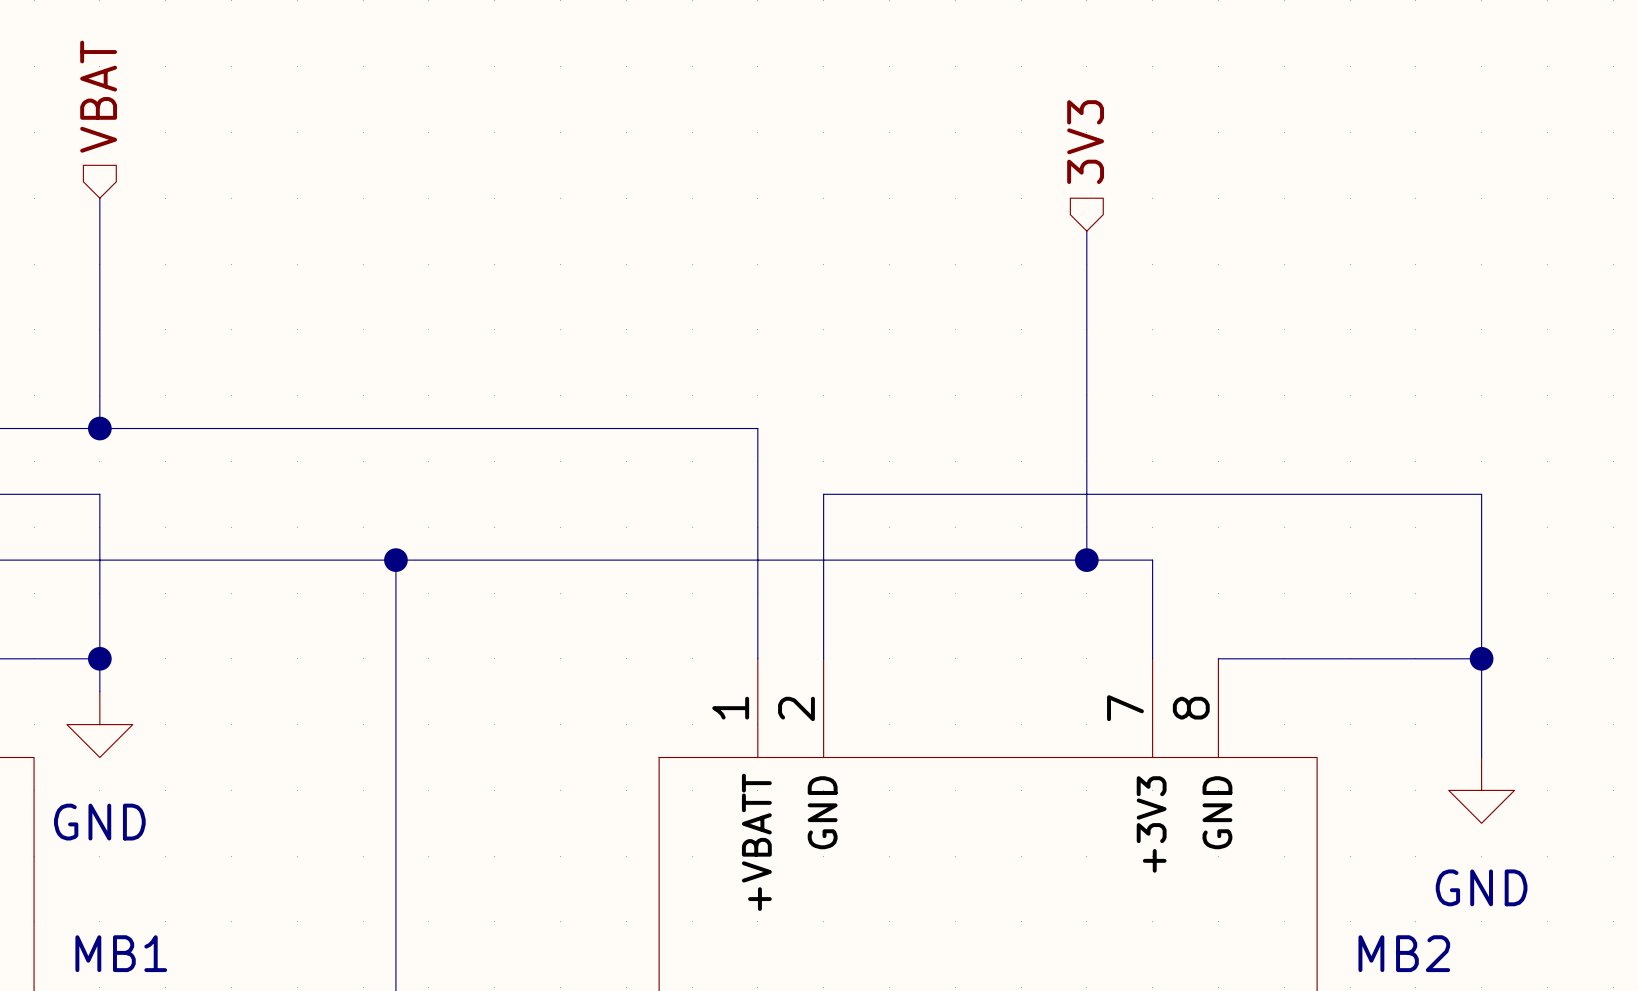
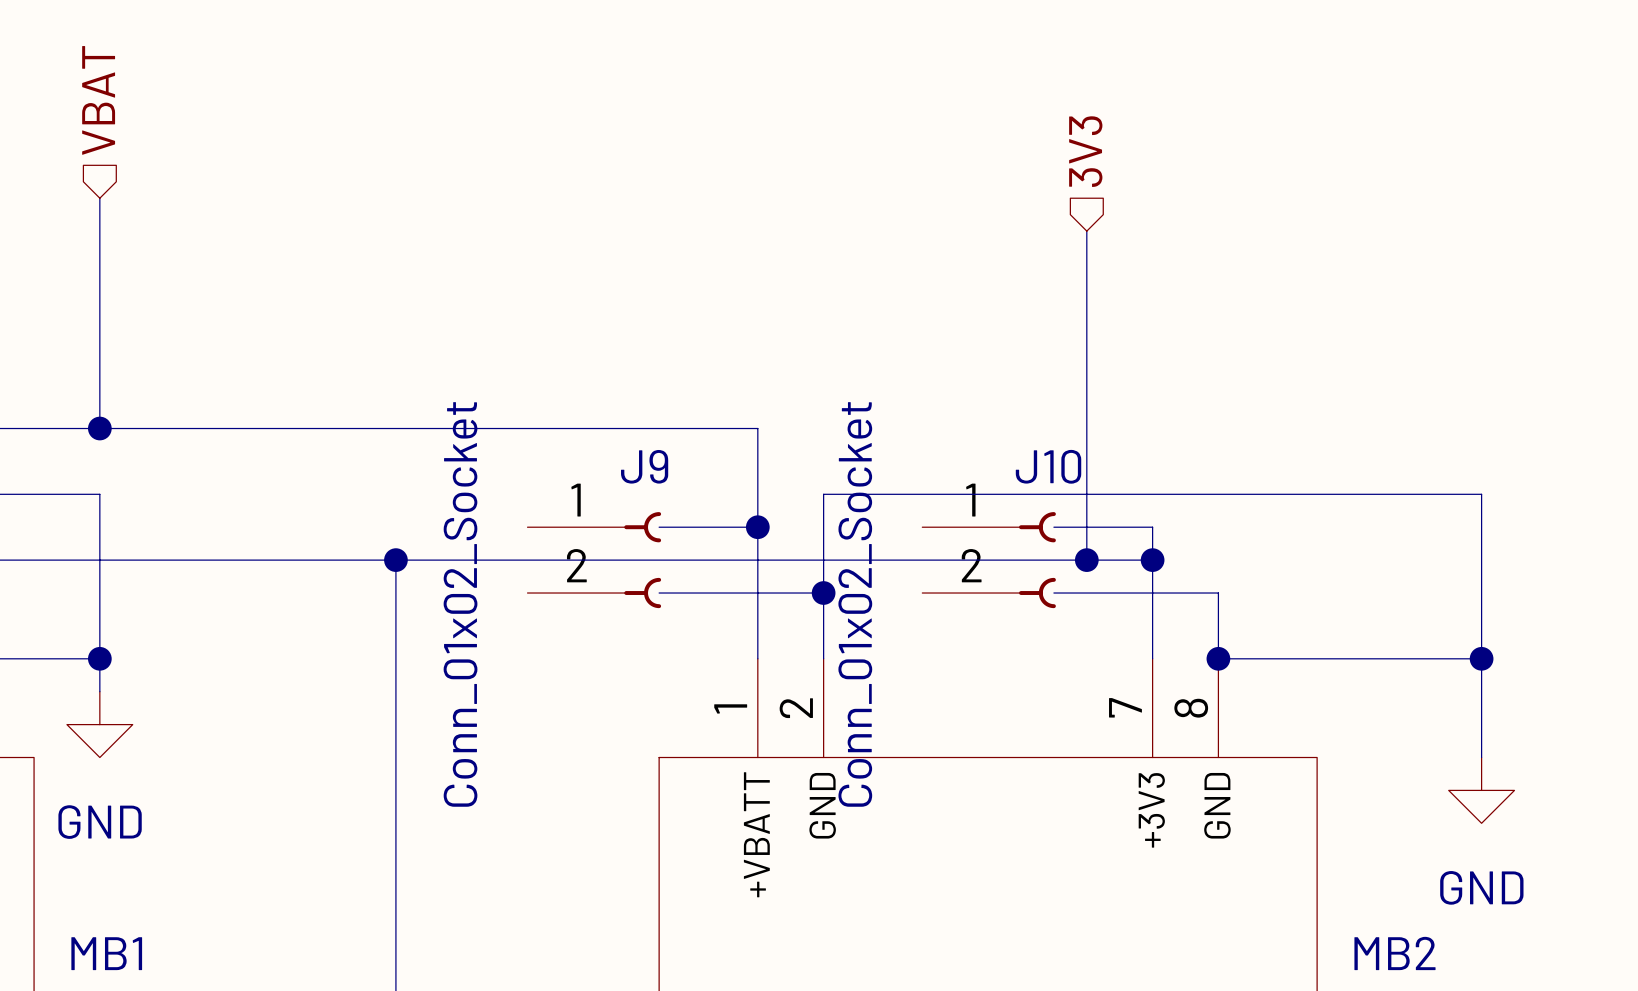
wire: none -> (659, 527) (757, 527)
junction: none -> (757, 527)
wire: none -> (1053, 527) (1152, 527) (1152, 560)
J9: none -> Conn_01x02_Socket (594, 560)
J10: none -> Conn_01x02_Socket (989, 560)
junction: none -> (1152, 560)
wire: none -> (659, 593) (823, 593)
junction: none -> (823, 593)
wire: none -> (1053, 593) (1218, 593) (1218, 658)
junction: none -> (1218, 658)

